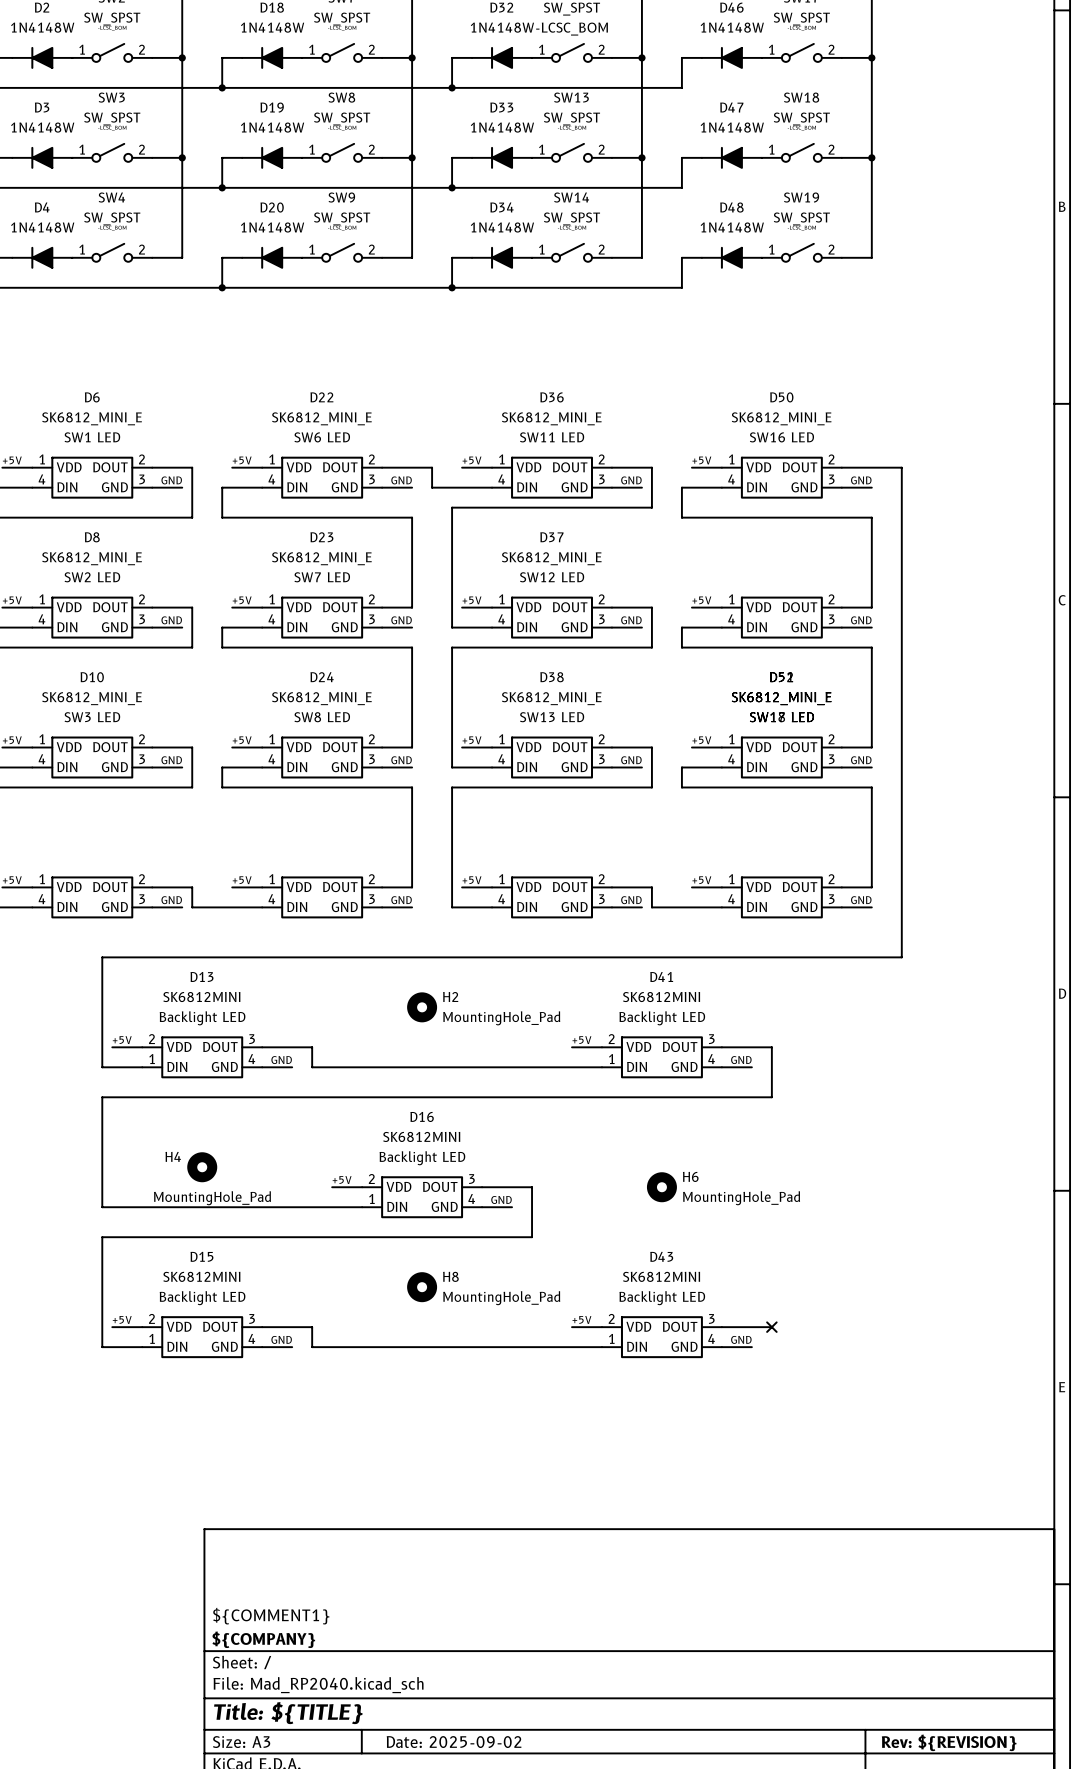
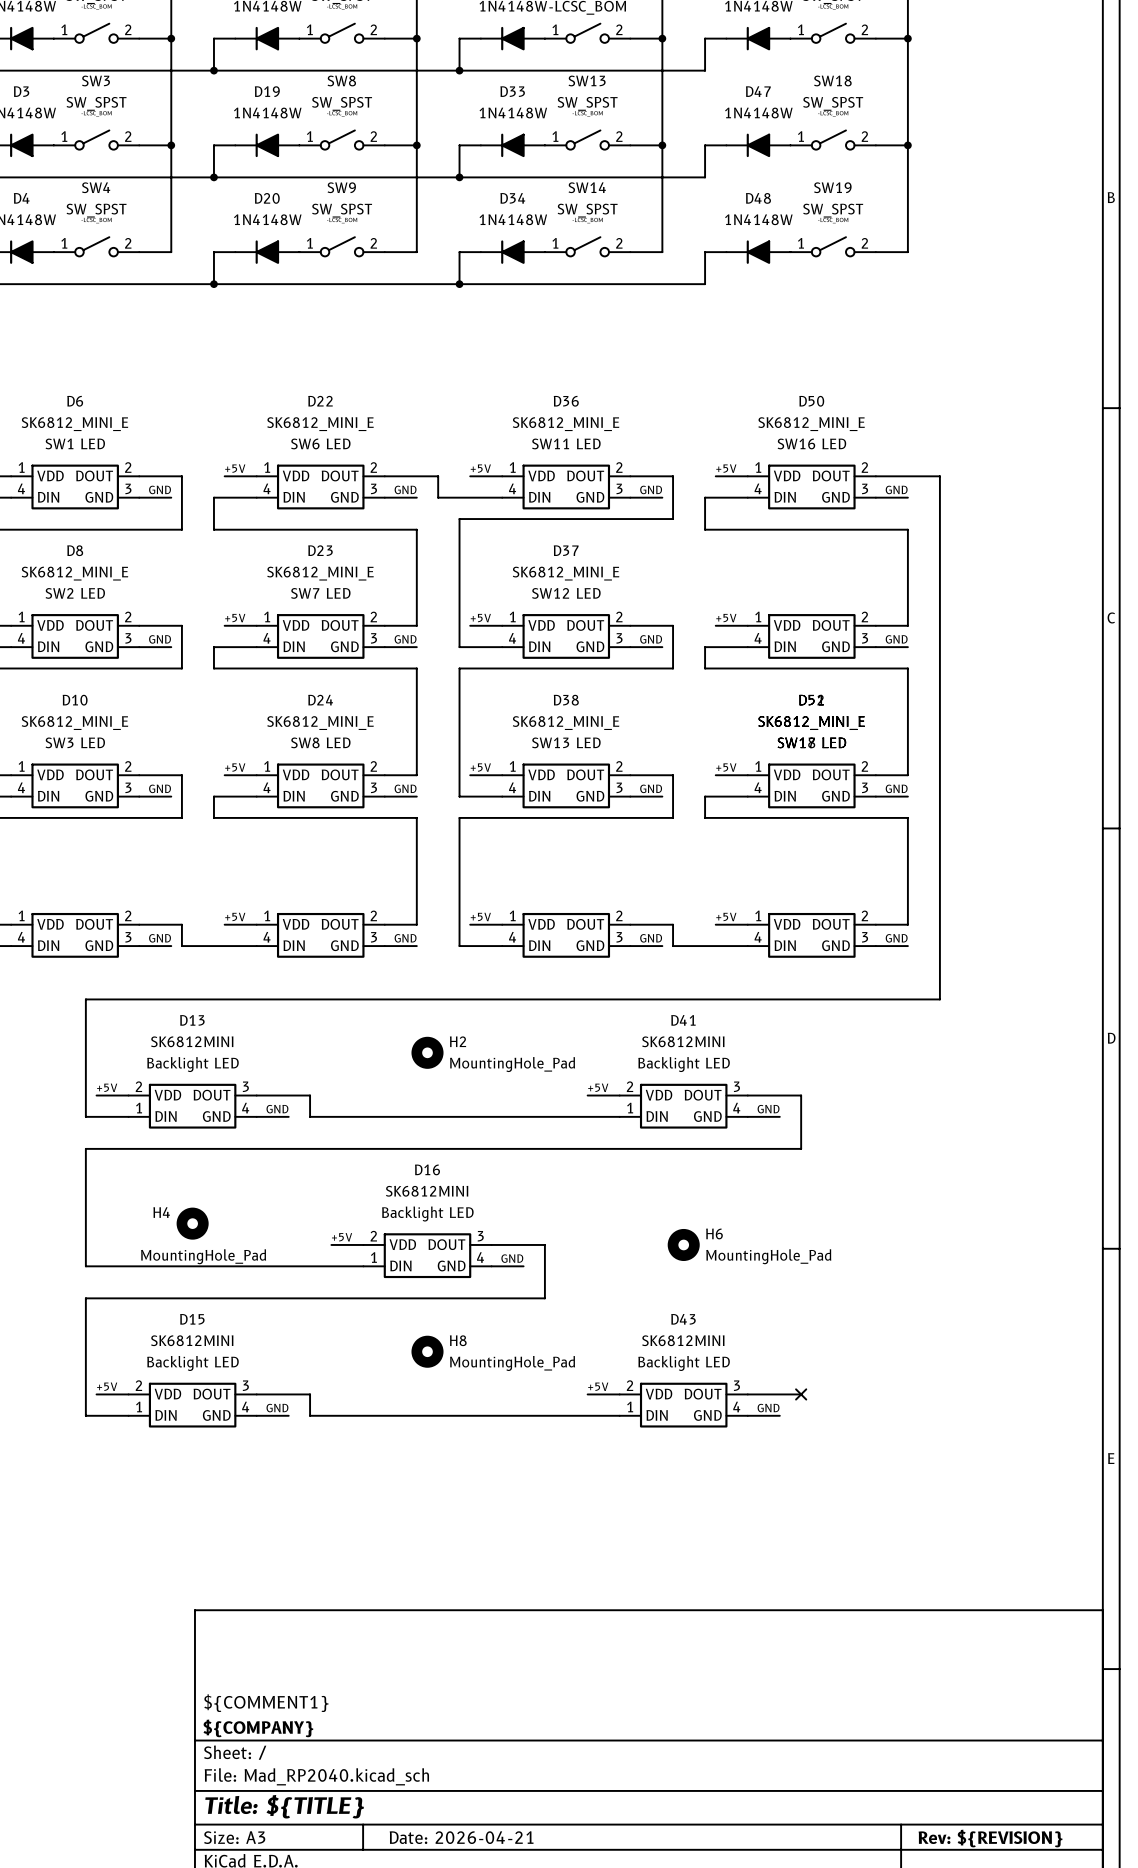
title block: Date: 2025-09-02 (454, 1742) -> Date: 2026-04-21 (461, 1837)

